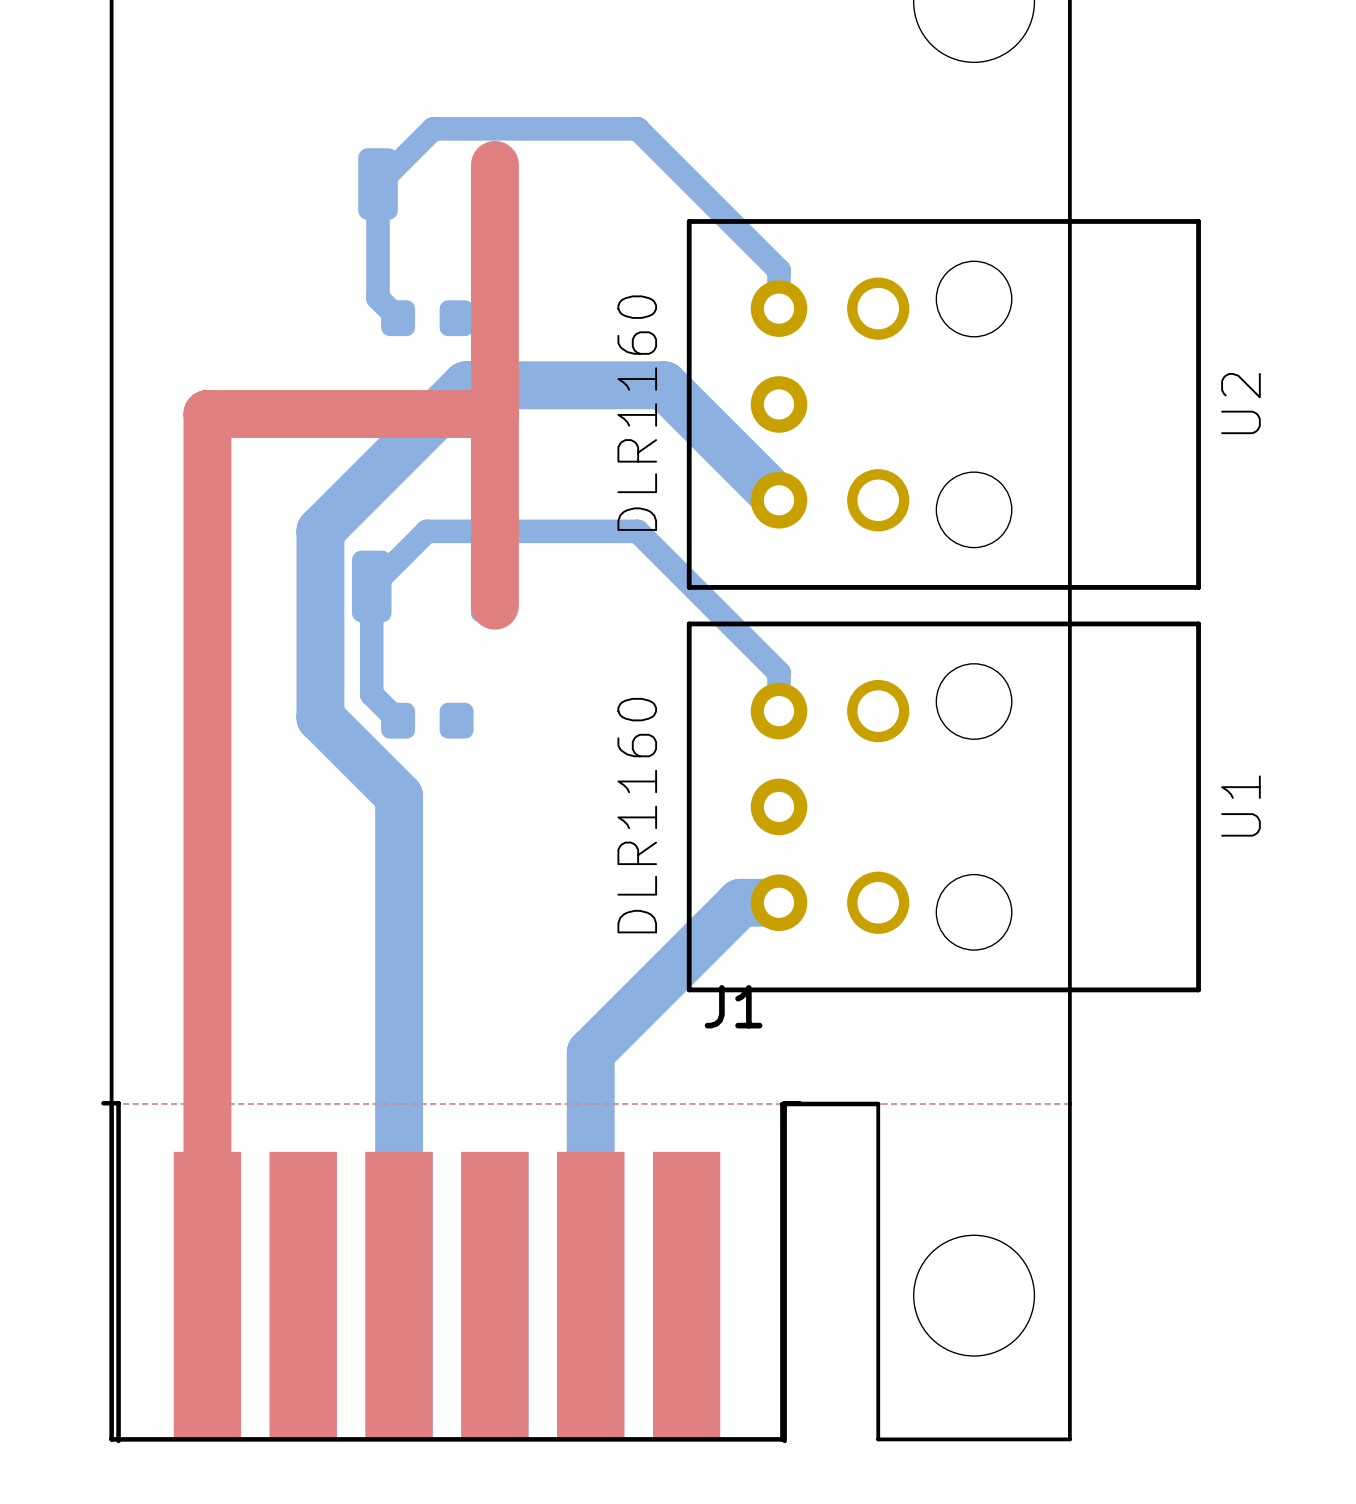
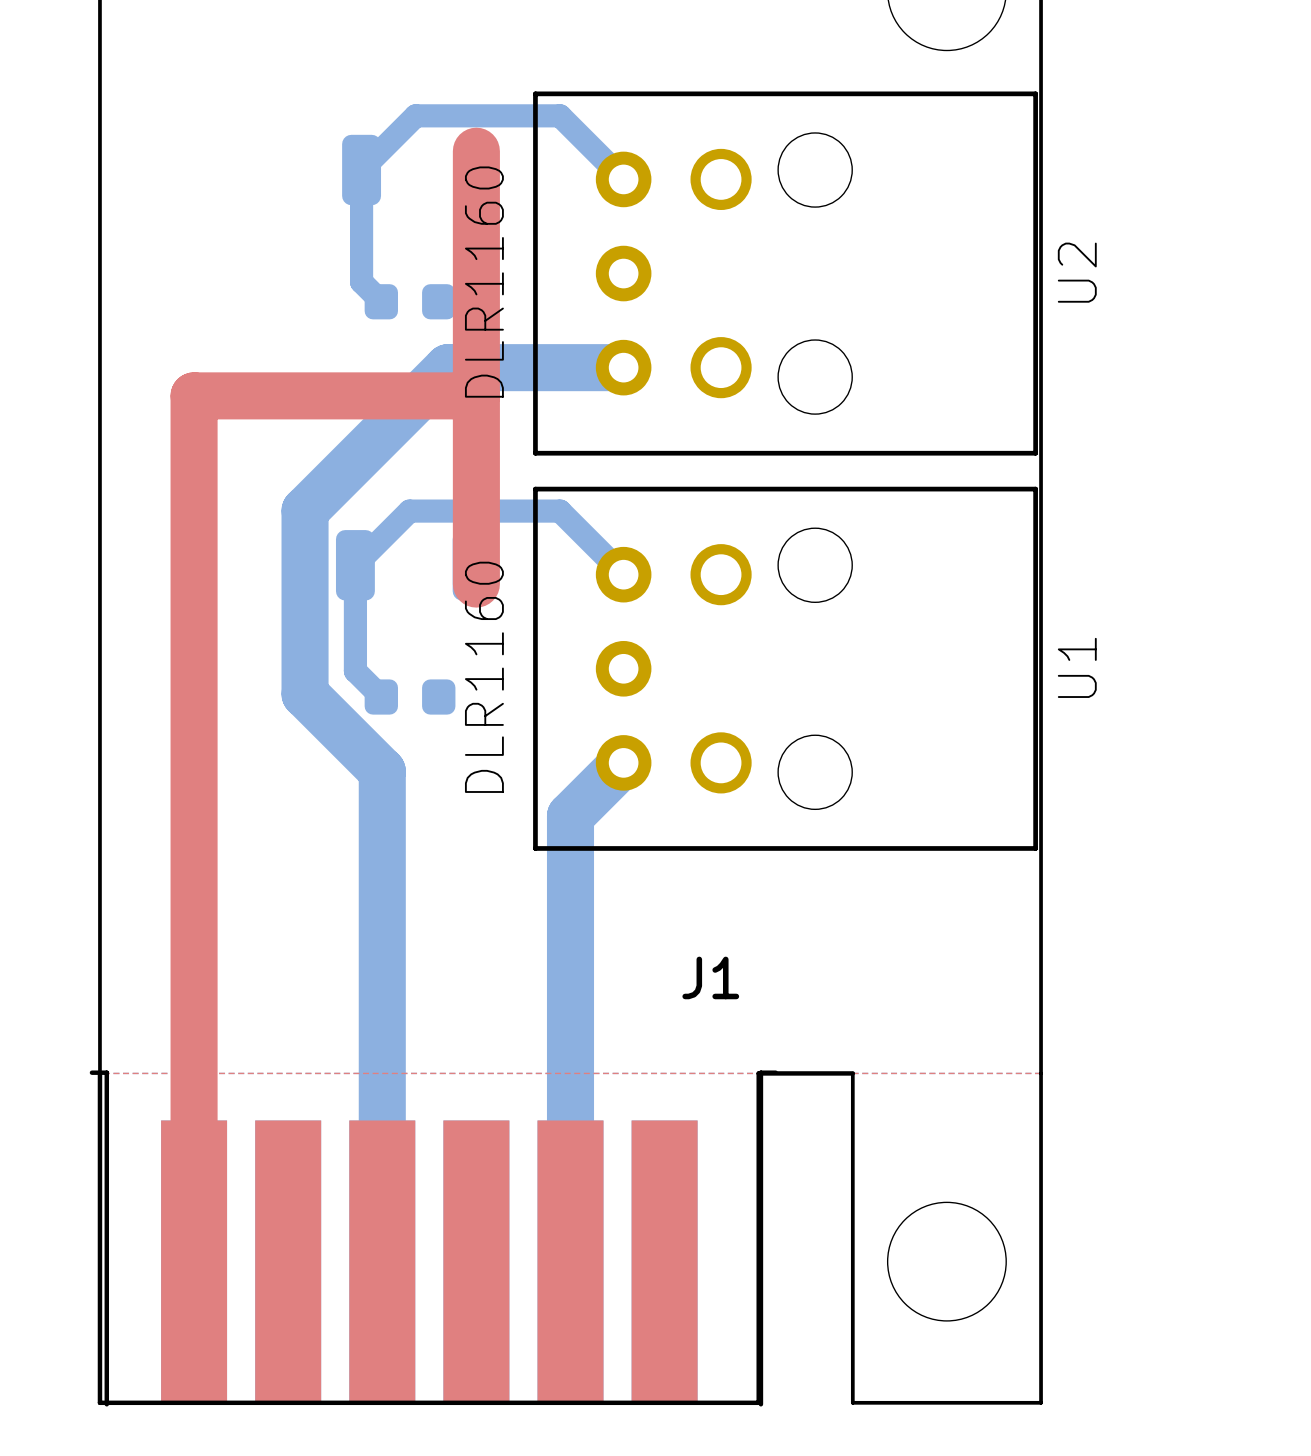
bottom track: (580, 128) (637, 128) (779, 270) (779, 308) -> (560, 115) (623, 179)
bottom track: (644, 385) (664, 385) (779, 500) -> none
U2 position: (943, 404) -> (785, 273)
bottom track: (580, 531) (637, 531) (779, 672) (779, 711) -> (560, 511) (623, 574)
U1 position: (943, 806) -> (785, 668)
bottom track: (779, 902) (740, 902) (590, 1052) -> (623, 762) (570, 816) (570, 1023)

